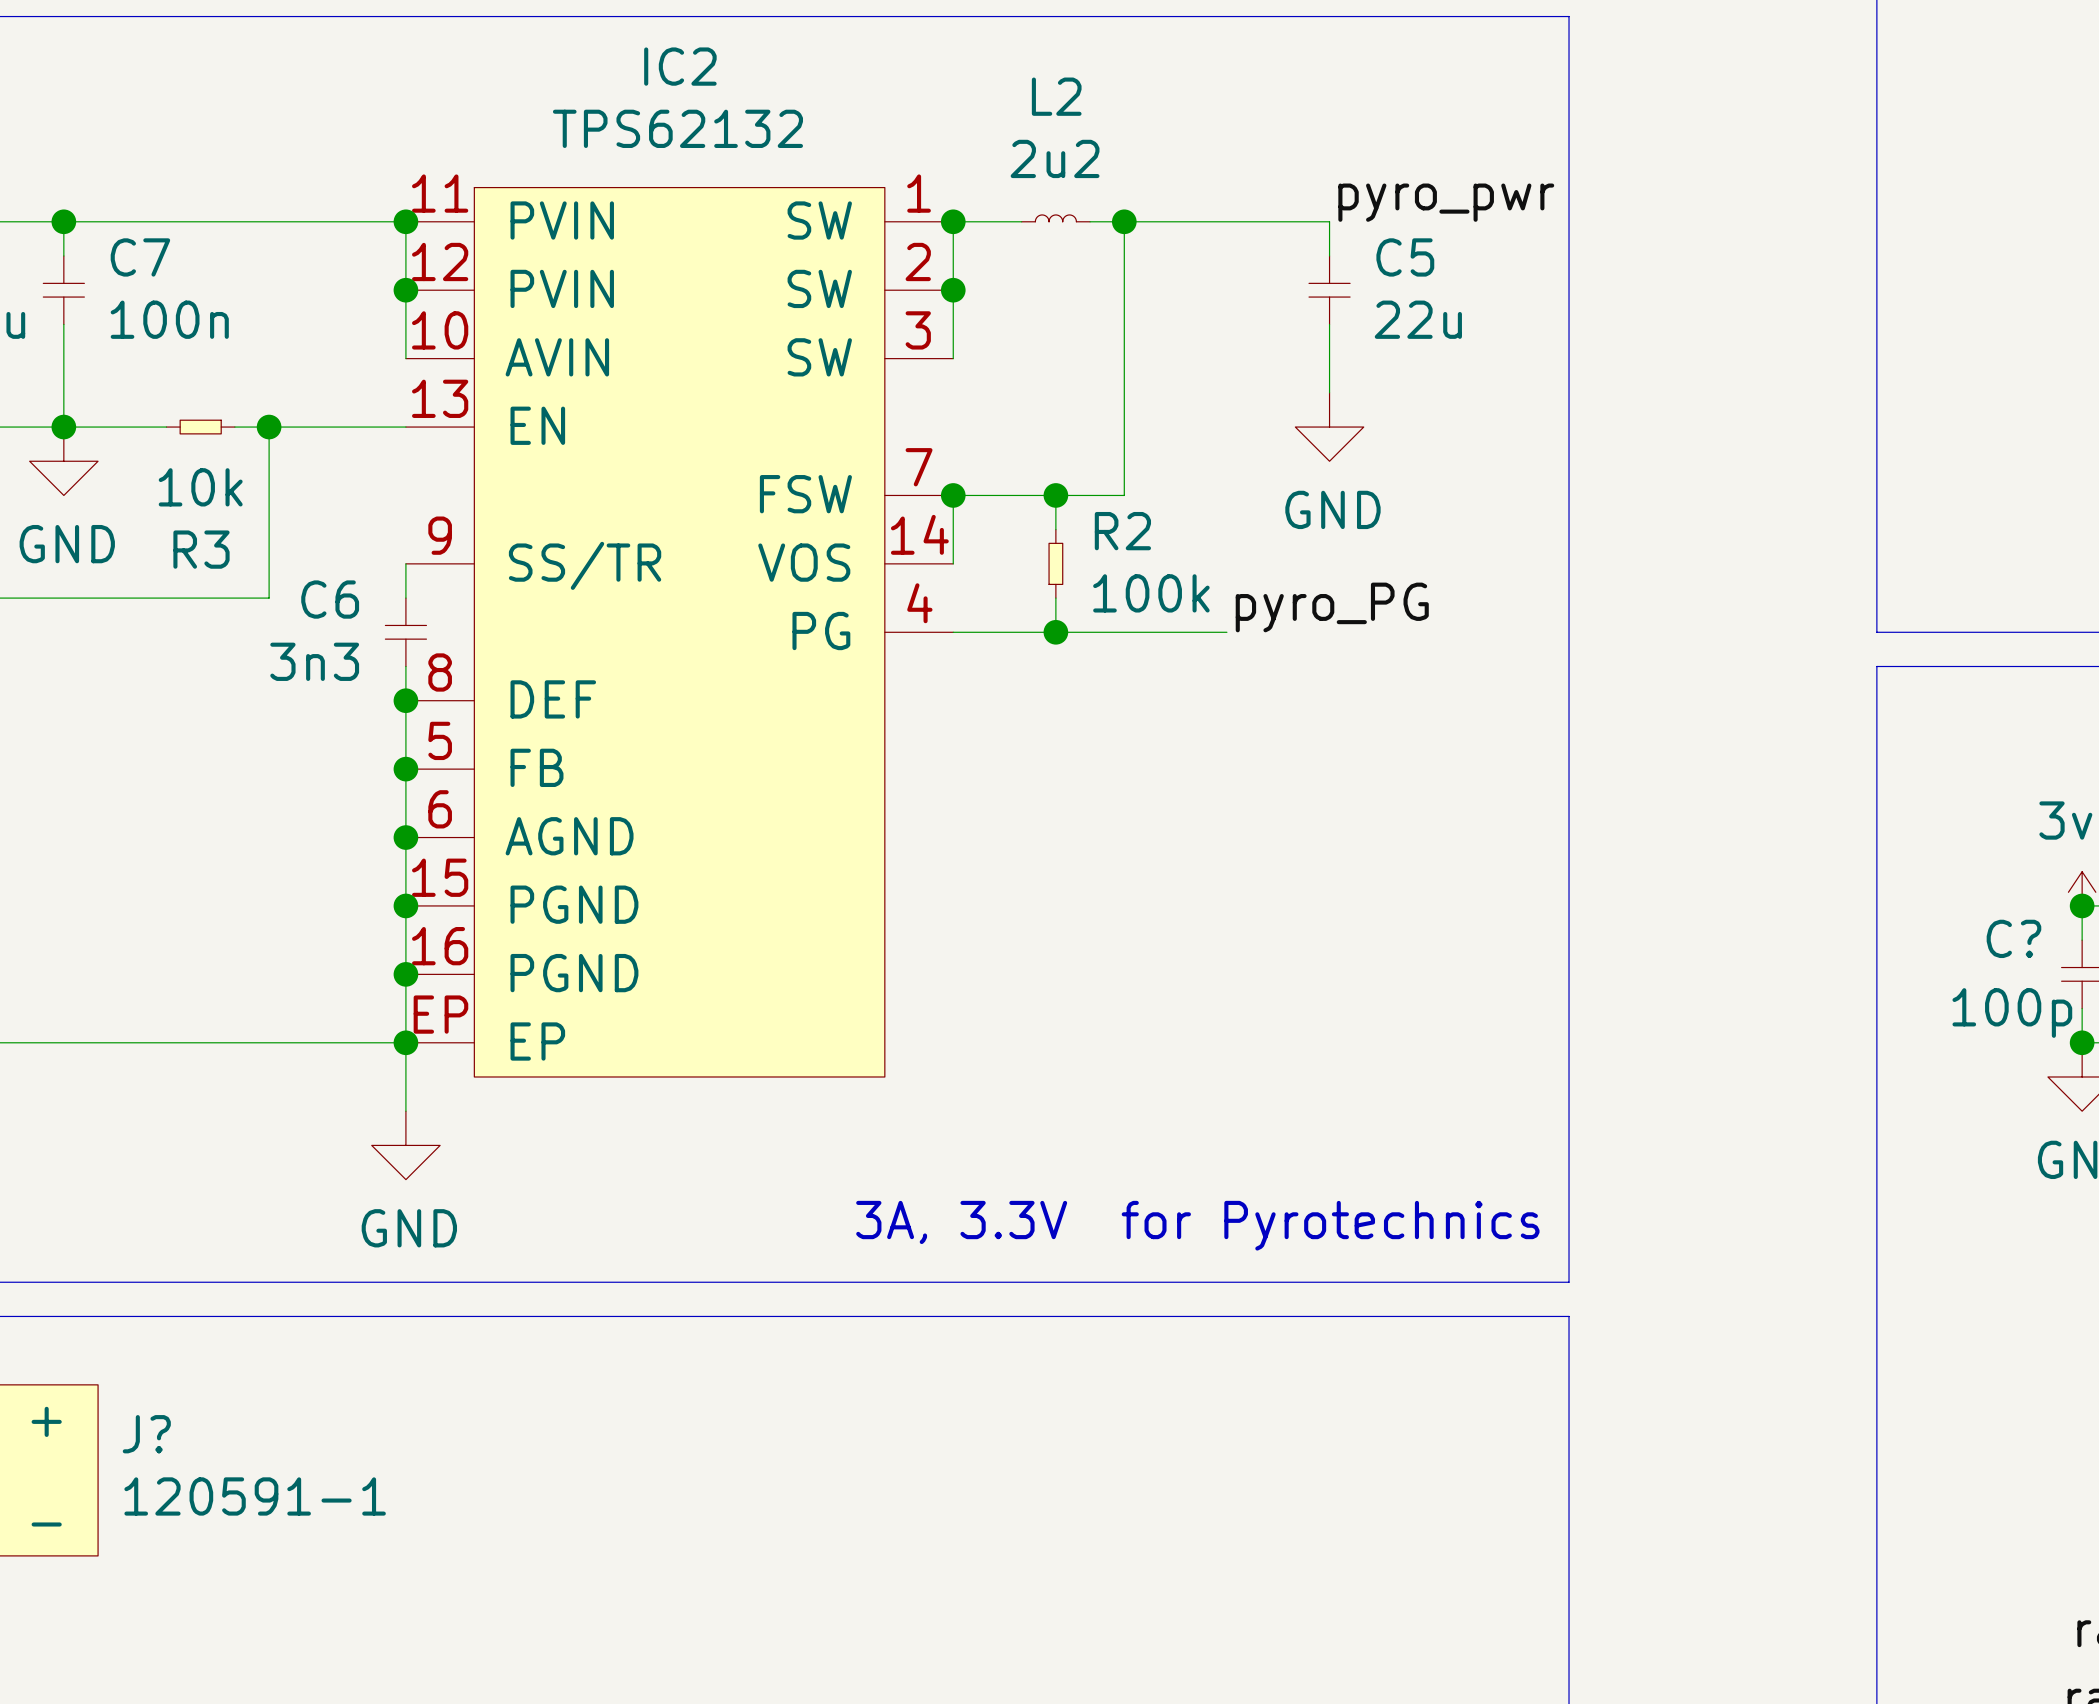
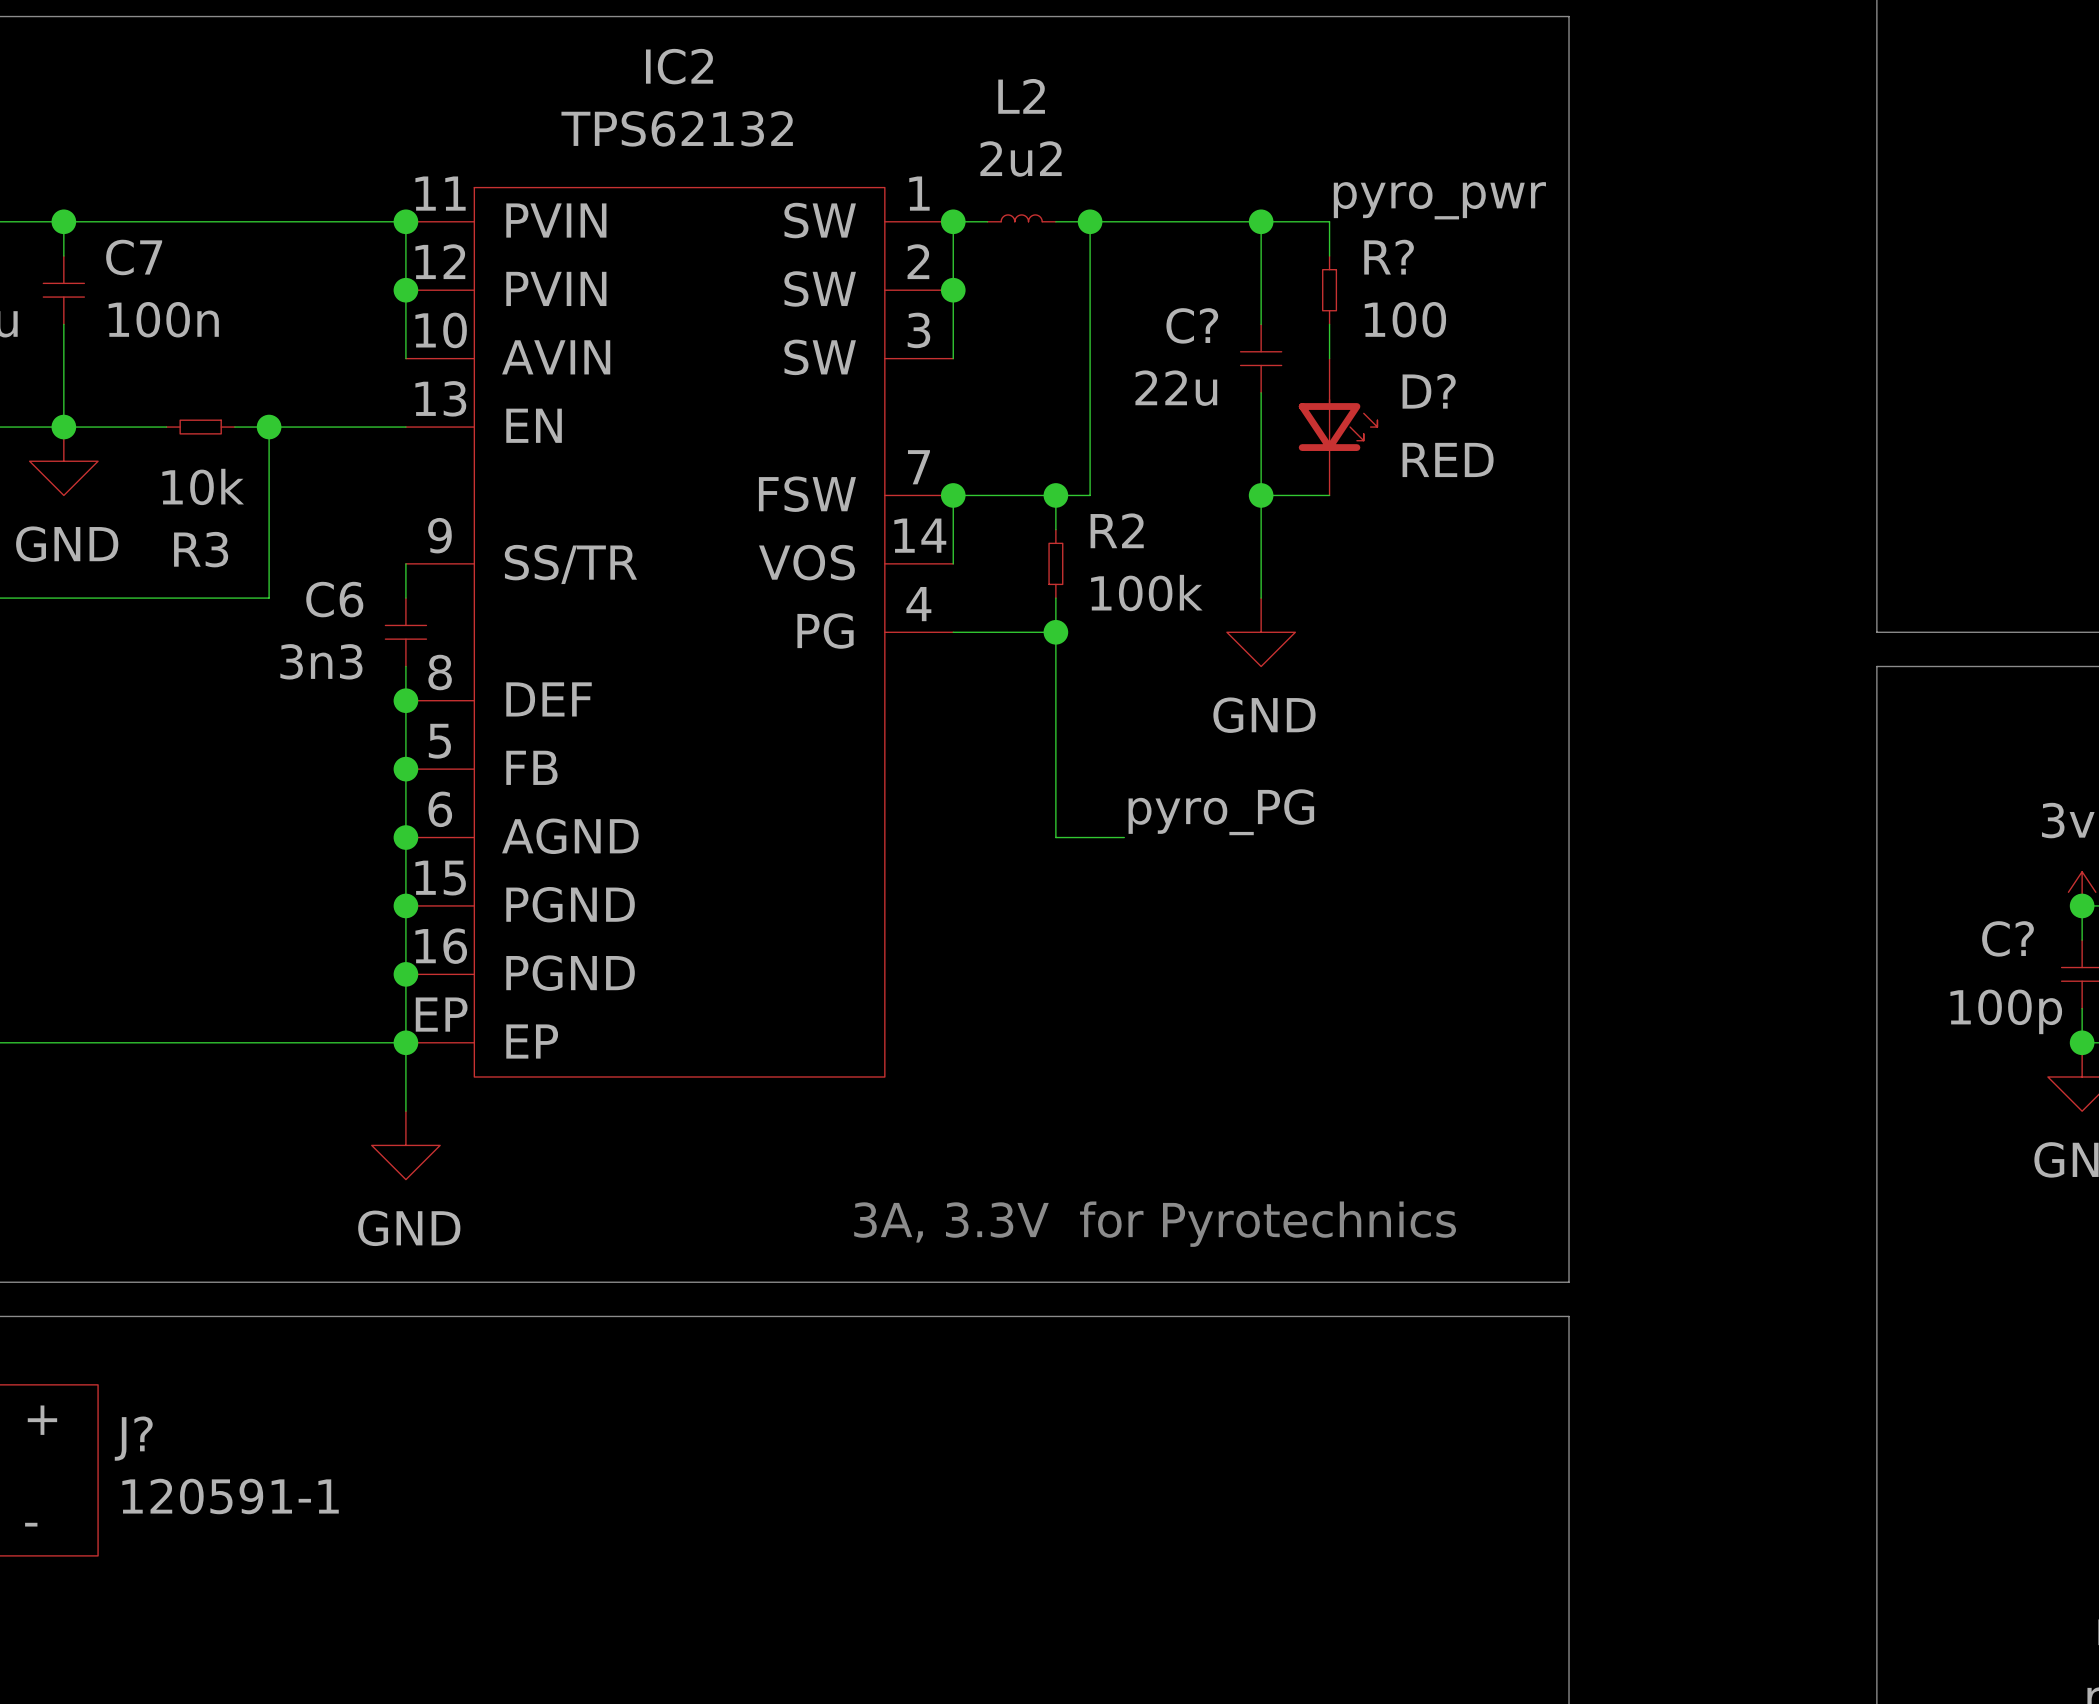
L2 position: (1055, 218) -> (1021, 218)
wire: (987, 221) (1021, 221) -> none
wire: (1124, 221) (1124, 495) (1090, 495) -> (1055, 221) (1090, 221) (1090, 495)
junction position: (1124, 221) -> (1090, 221)
wire: none -> (1261, 221) (1261, 324)
junction: none -> (1261, 221)
C5: 22u (1329, 290) -> none
R?: none -> 100 (1329, 290)
C?: none -> 22u (1261, 358)
wire: none -> (1261, 392) (1261, 598)
power symbol position: GND (1329, 427) -> GND (1261, 632)
D?: none -> RED (1338, 427)
wire: none -> (1261, 495) (1329, 495)
junction: none -> (1261, 495)
label position: pyro_PG (1332, 607) -> pyro_PG (1221, 812)
wire: (1055, 632) (1226, 632) -> (1055, 632) (1055, 837) (1124, 837)

